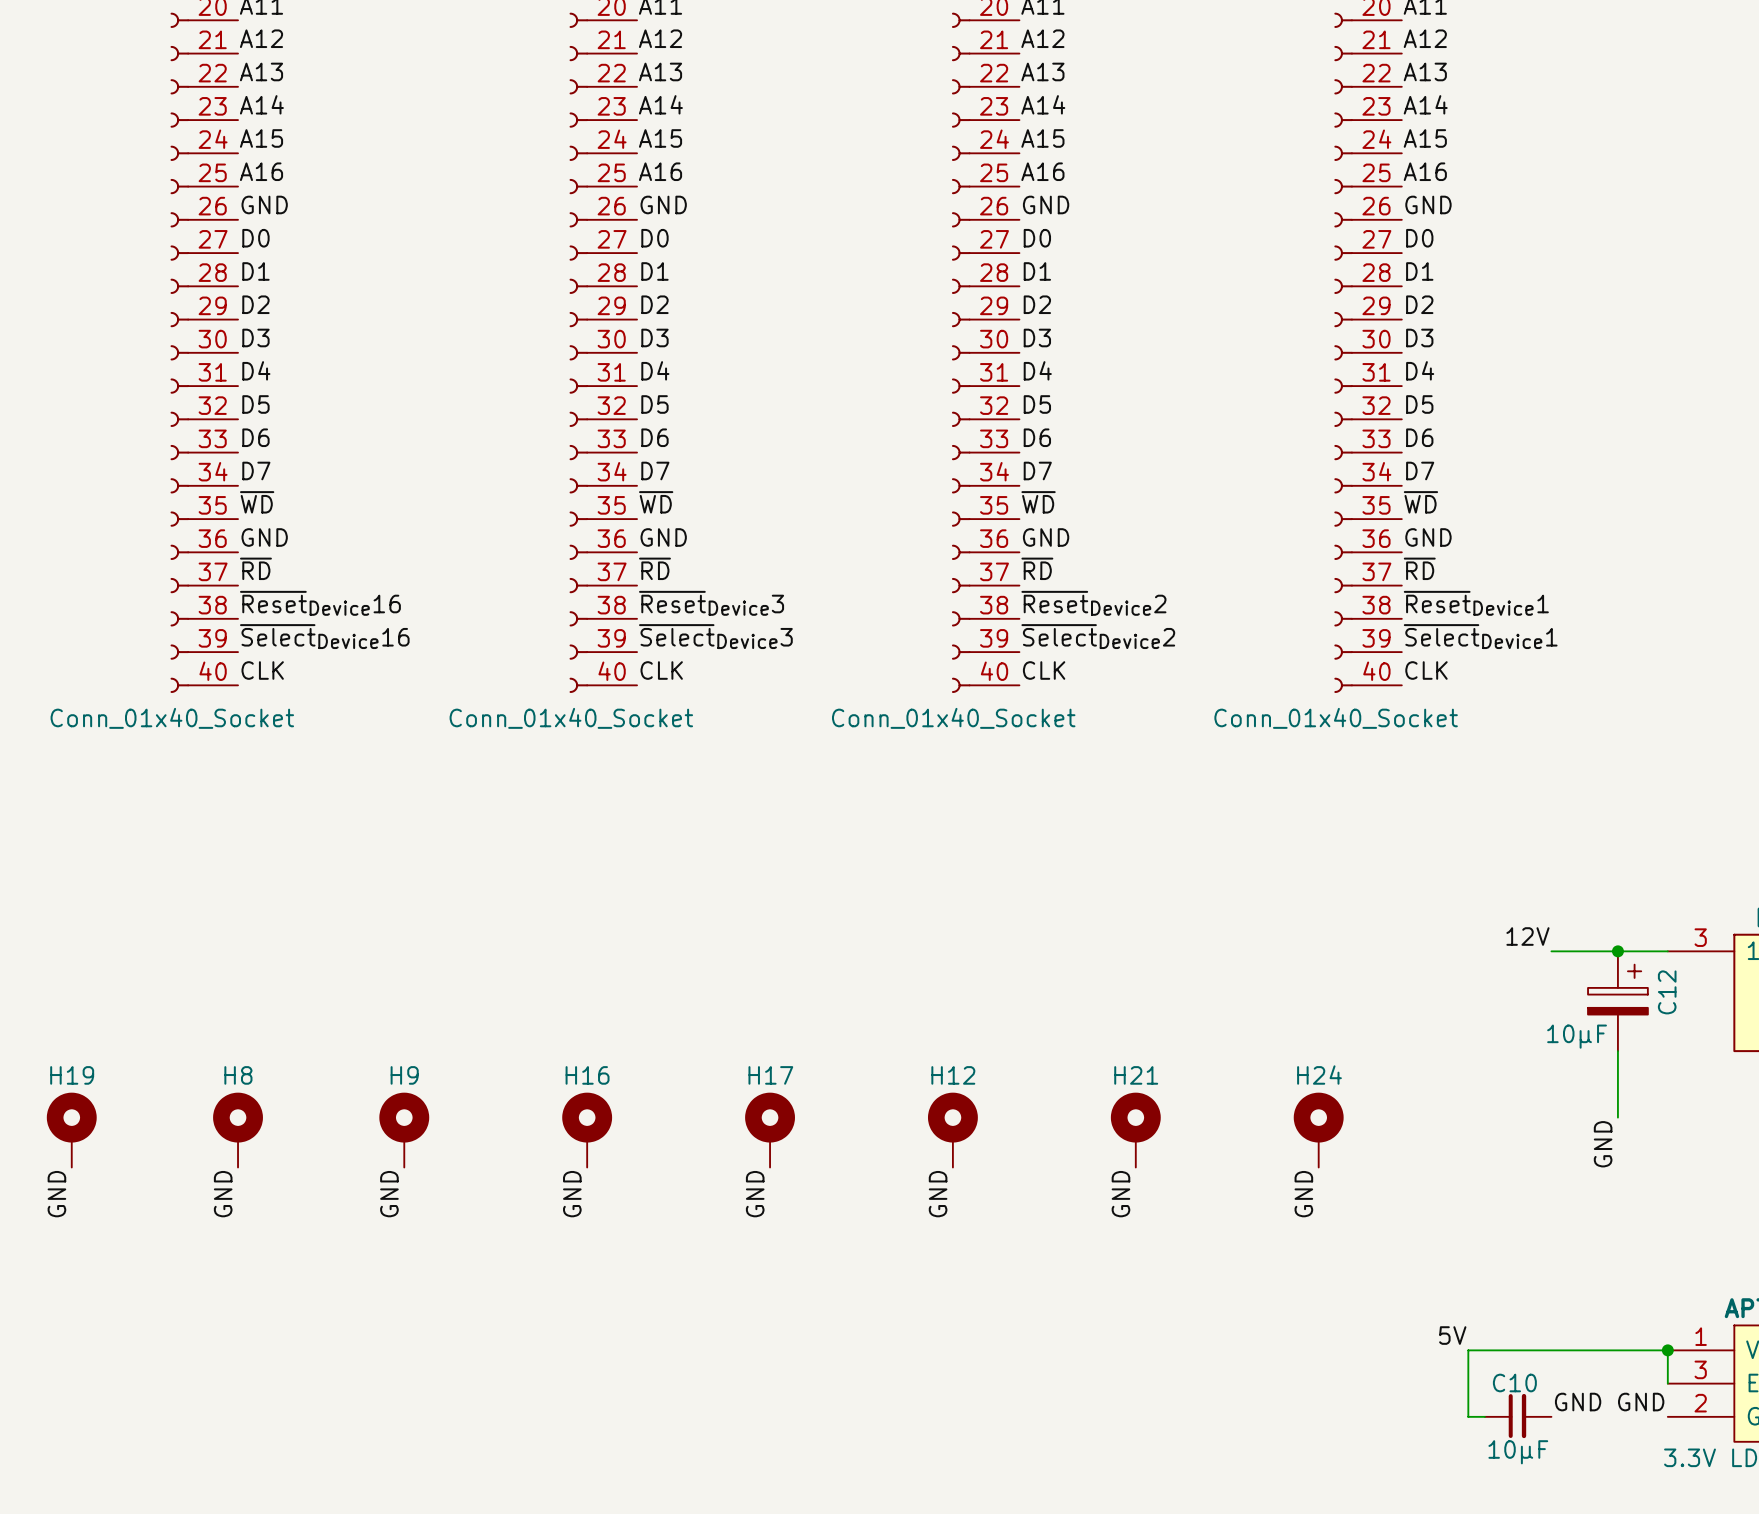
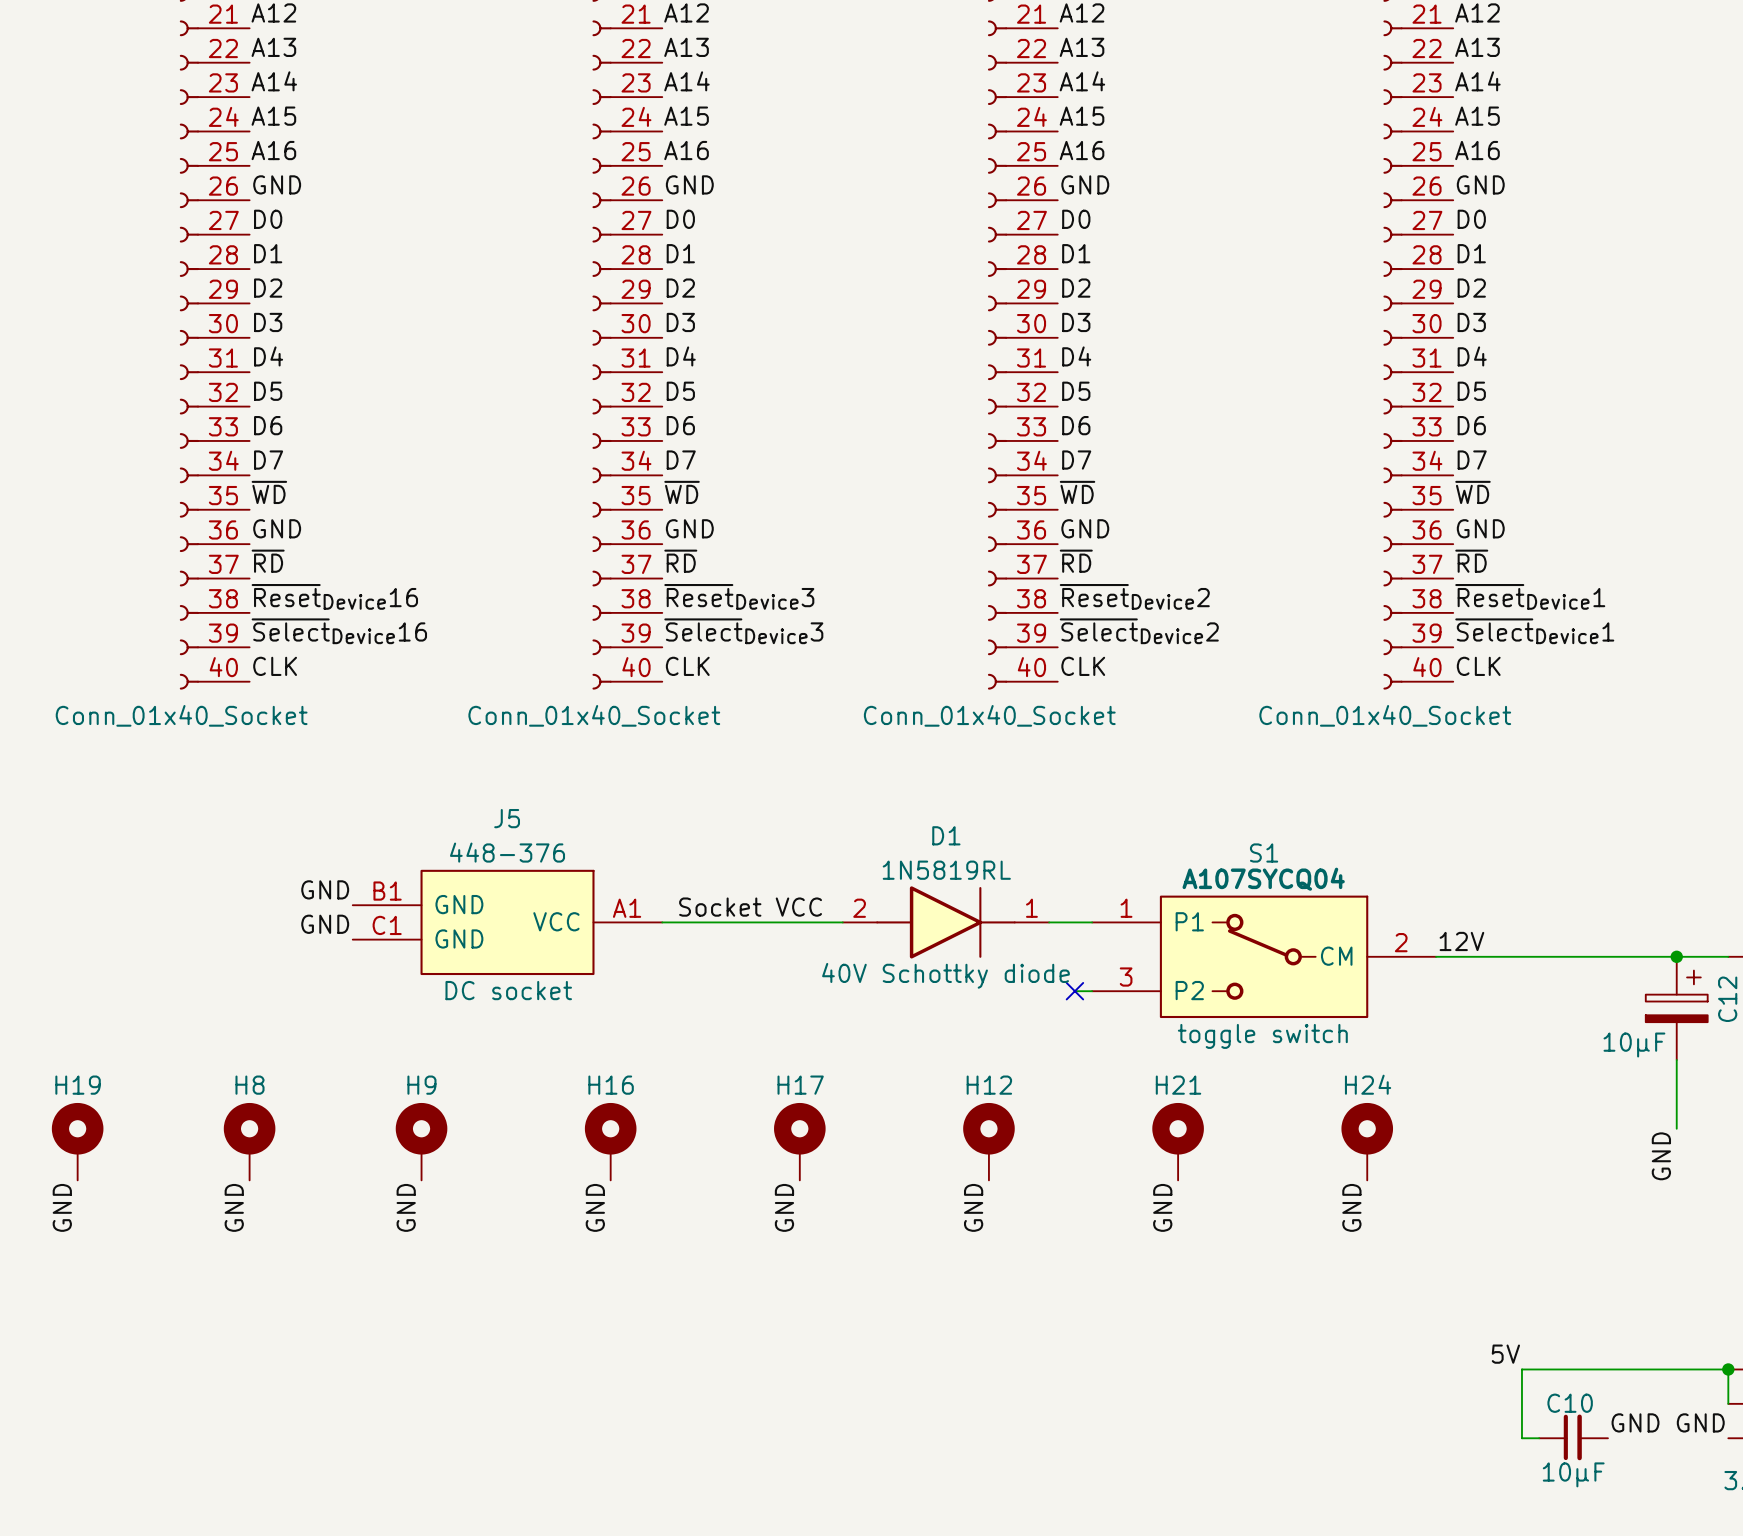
label: none -> GND (325, 889)
label: none -> Socket VCC (750, 907)
J5: none -> 448-376 (507, 922)
wire: none -> (662, 922) (842, 922)
D1: none -> 1N5819RL (945, 922)
wire: none -> (1049, 922) (1092, 922)
label: none -> GND (325, 924)
label position: 12V (1527, 936) -> 12V (1461, 941)
S1: none -> A107SYCQ04 (1264, 956)
wire: none -> (1436, 956) (1607, 956)
wire: none -> (1074, 991) (1092, 991)
no-connect mark: none -> (1074, 991)

